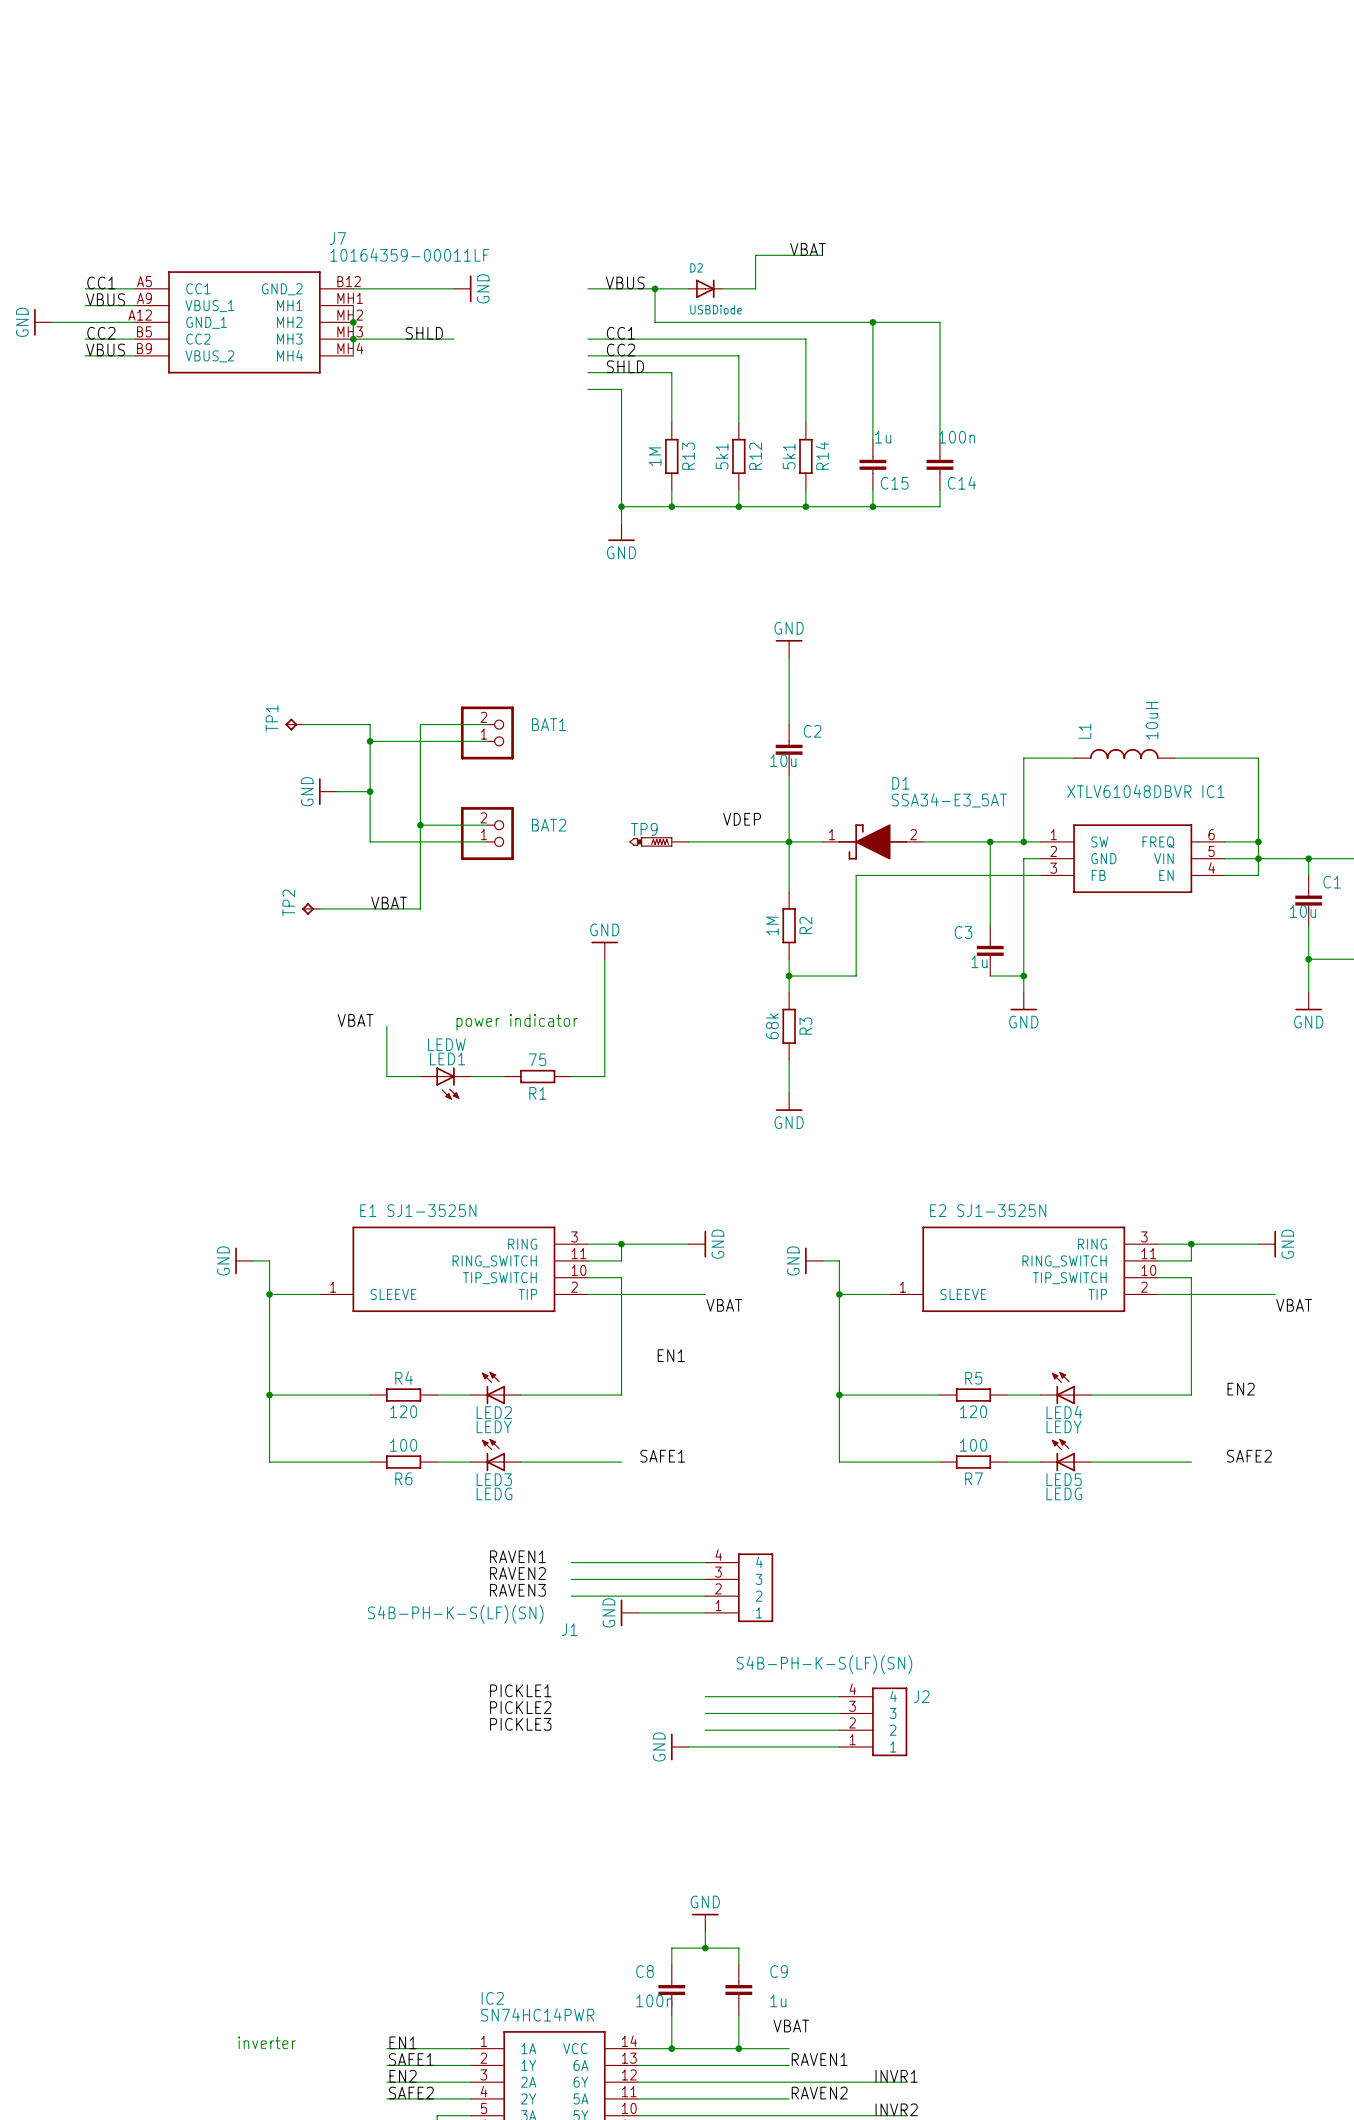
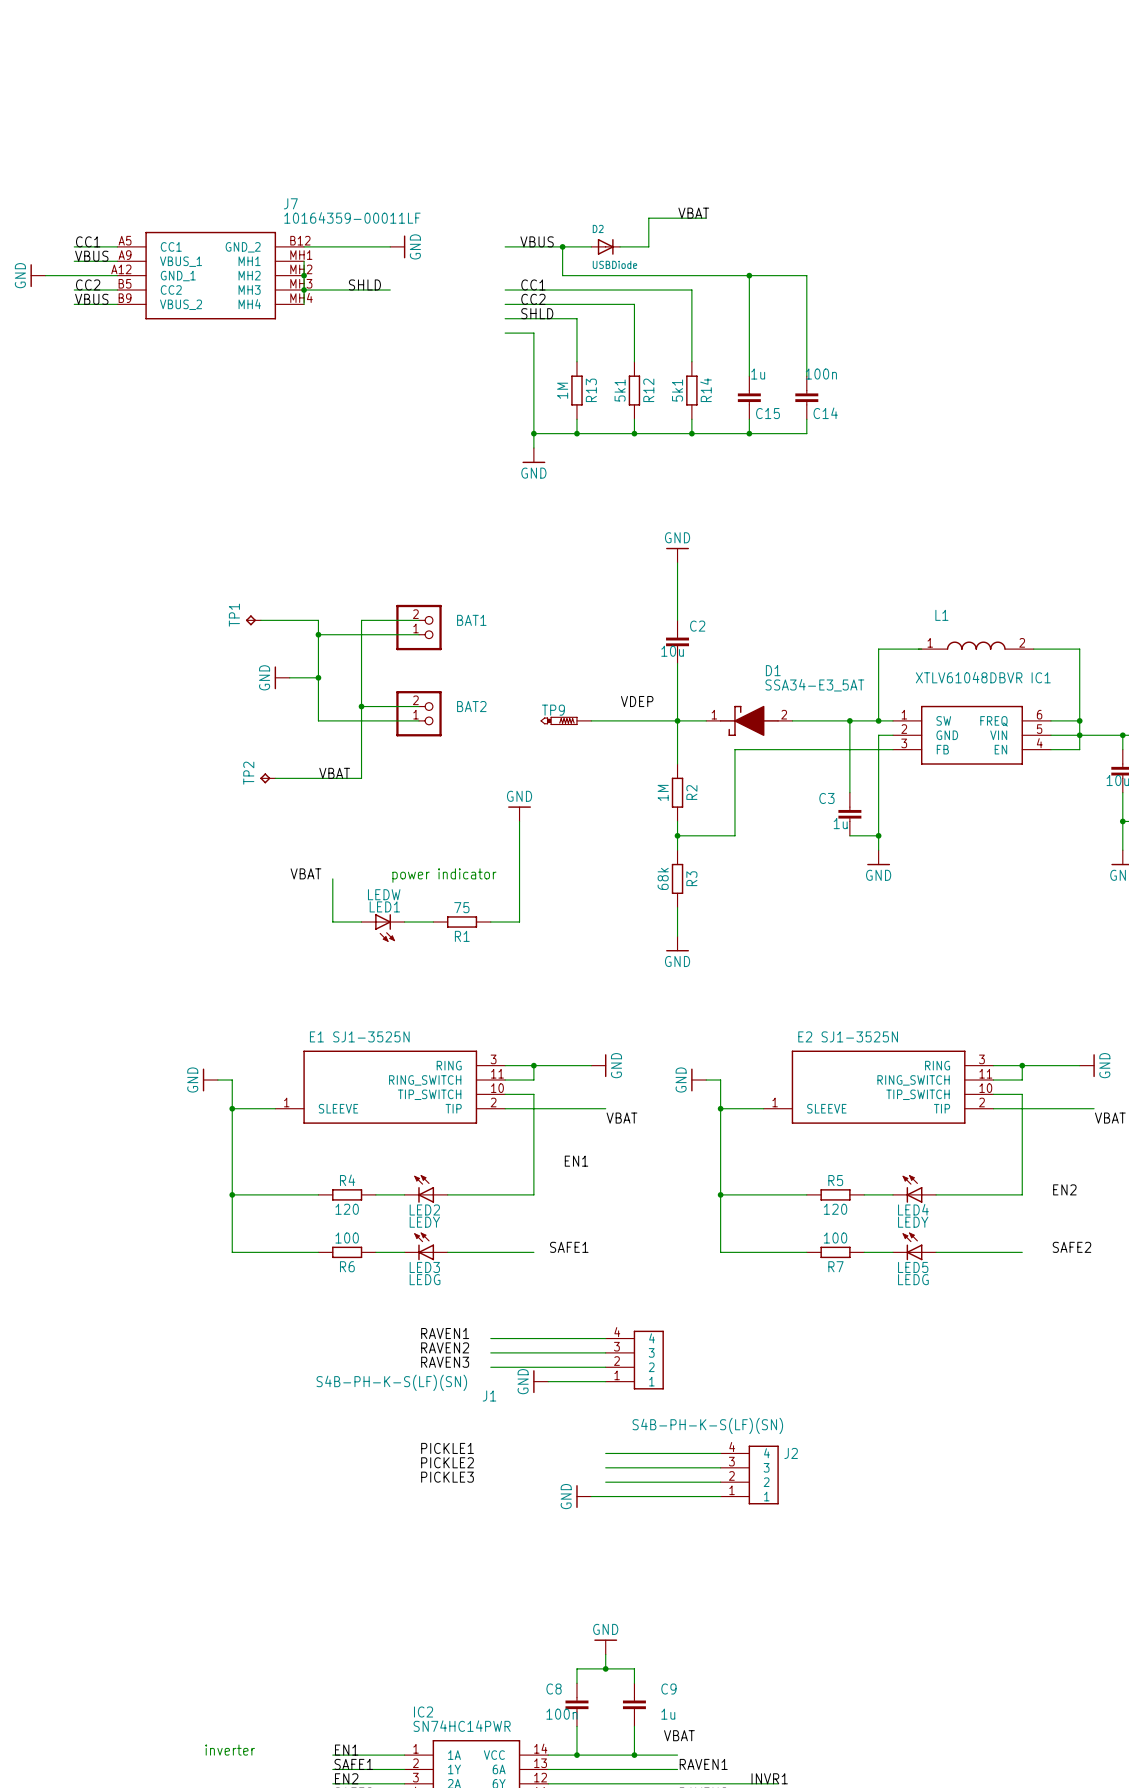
L1 value: 10uH (1151, 720) -> none
L1 symbol: [1074, 748, 1175, 759] -> [918, 641, 1034, 650]

